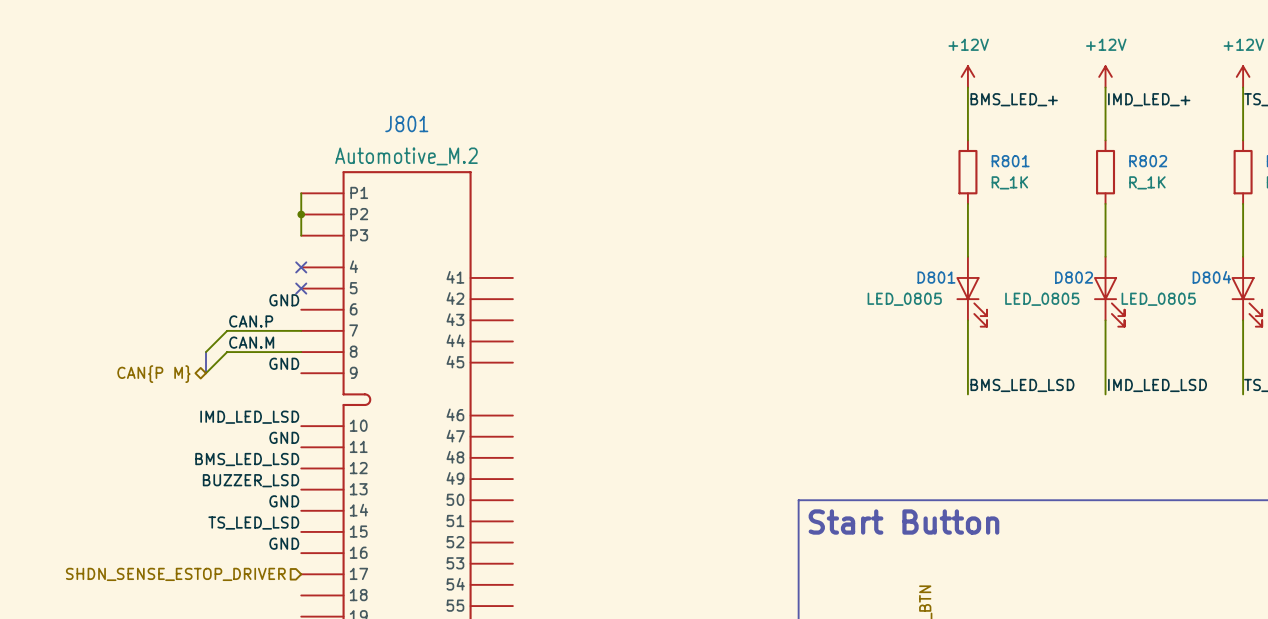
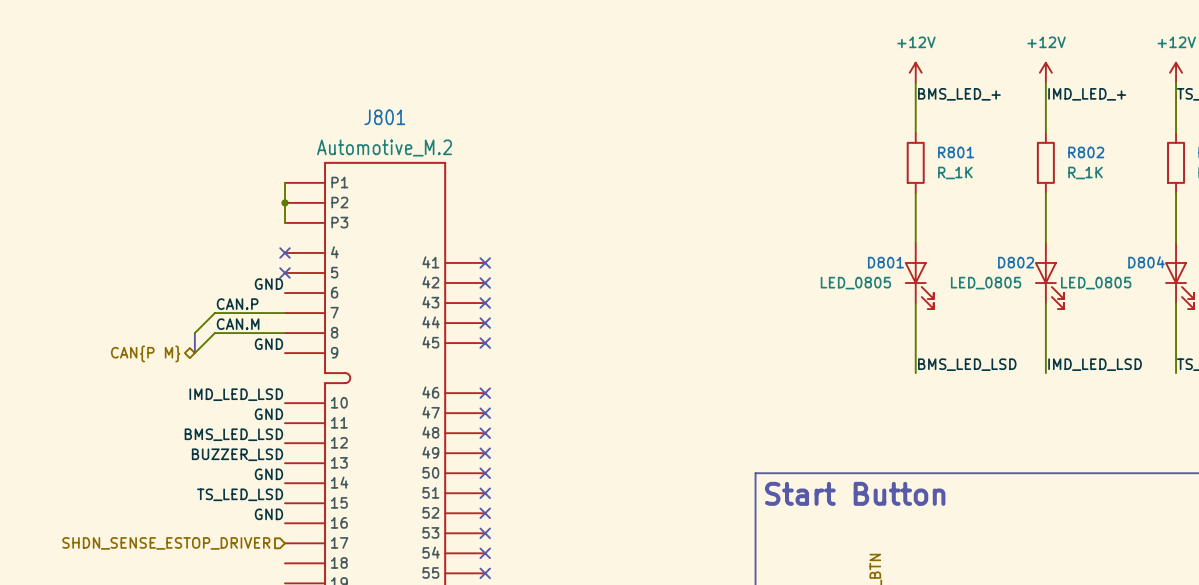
no-connect mark: none -> (485, 262)
no-connect mark: none -> (485, 283)
no-connect mark: none -> (485, 303)
no-connect mark: none -> (485, 323)
no-connect mark: none -> (485, 343)
no-connect mark: none -> (485, 393)
no-connect mark: none -> (485, 413)
no-connect mark: none -> (485, 433)
no-connect mark: none -> (485, 453)
no-connect mark: none -> (485, 473)
no-connect mark: none -> (485, 493)
no-connect mark: none -> (485, 513)
no-connect mark: none -> (485, 533)
no-connect mark: none -> (485, 553)
no-connect mark: none -> (485, 573)

